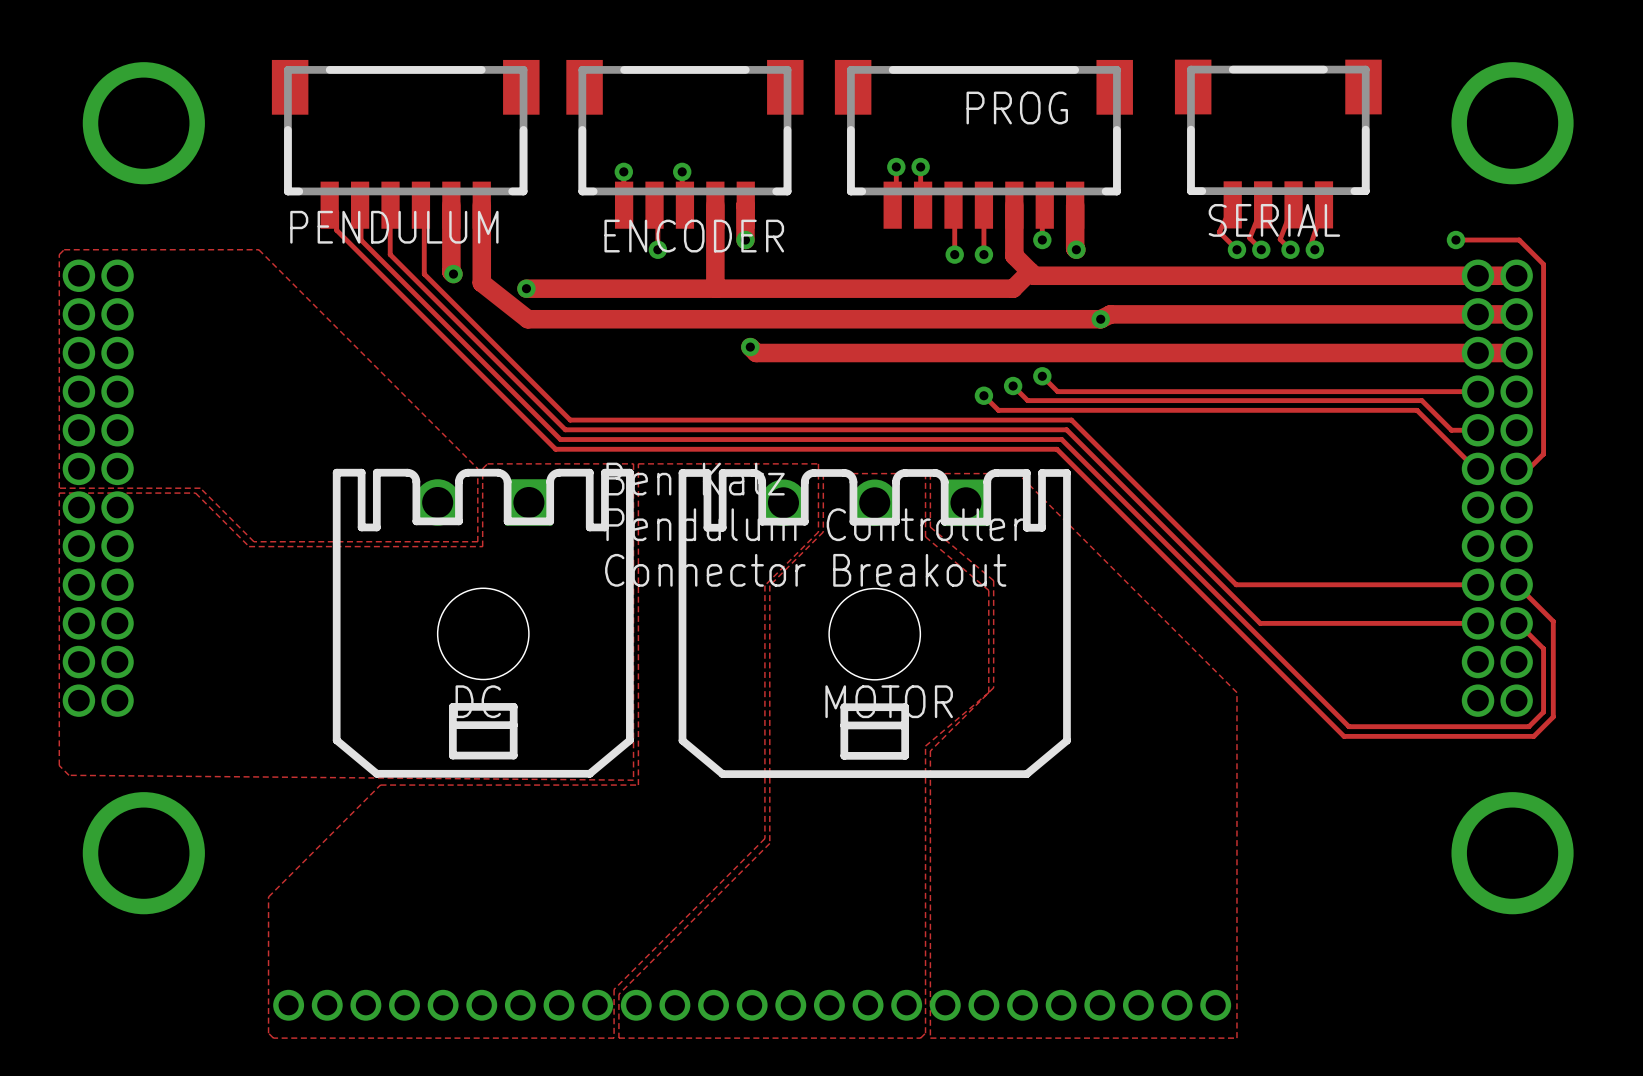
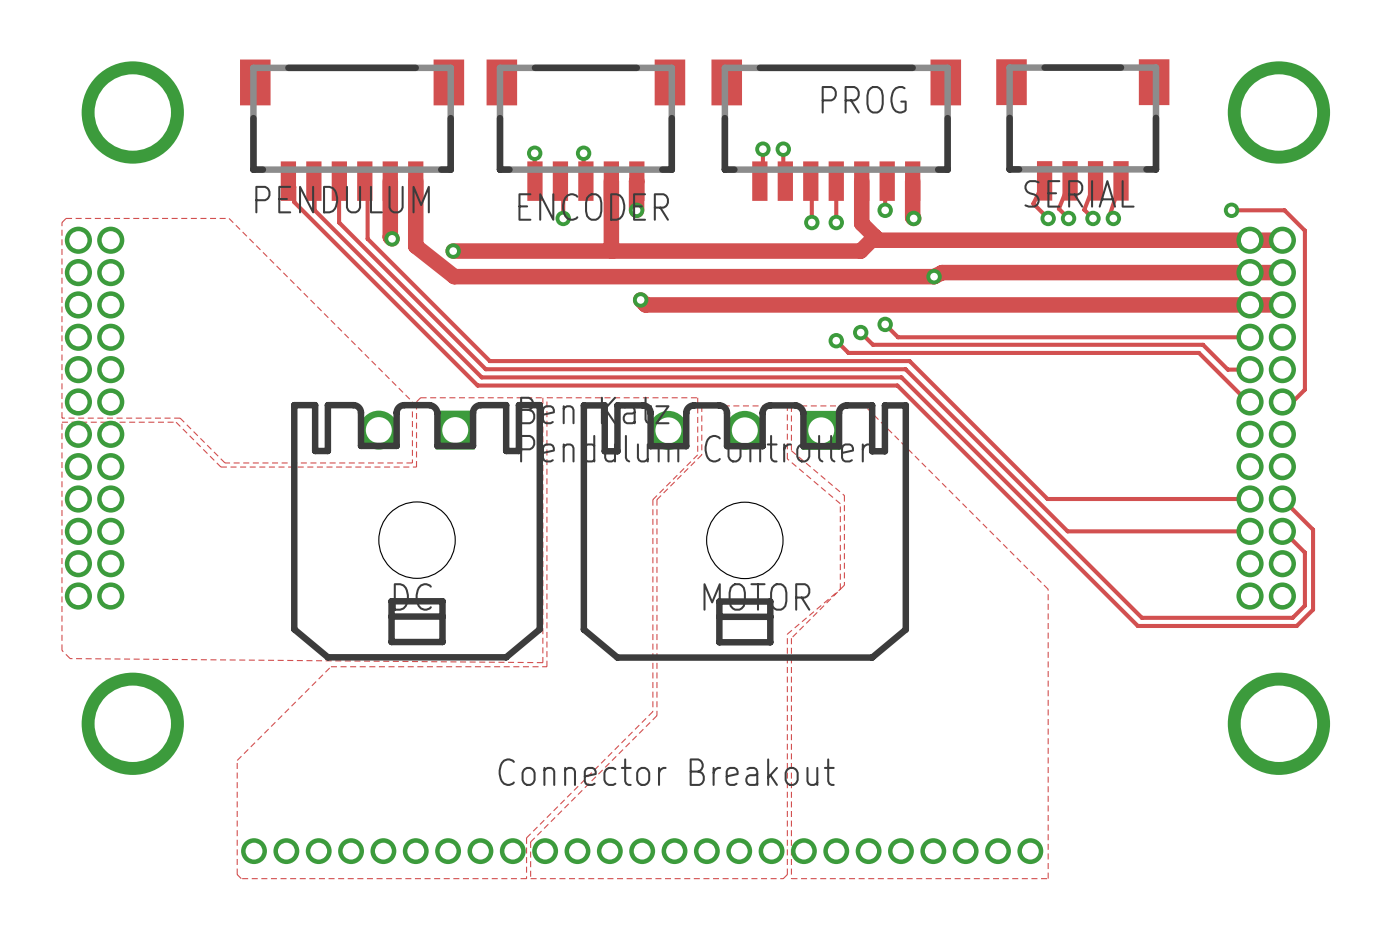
text position: Connector Breakout (805, 570) -> Connector Breakout (666, 772)

